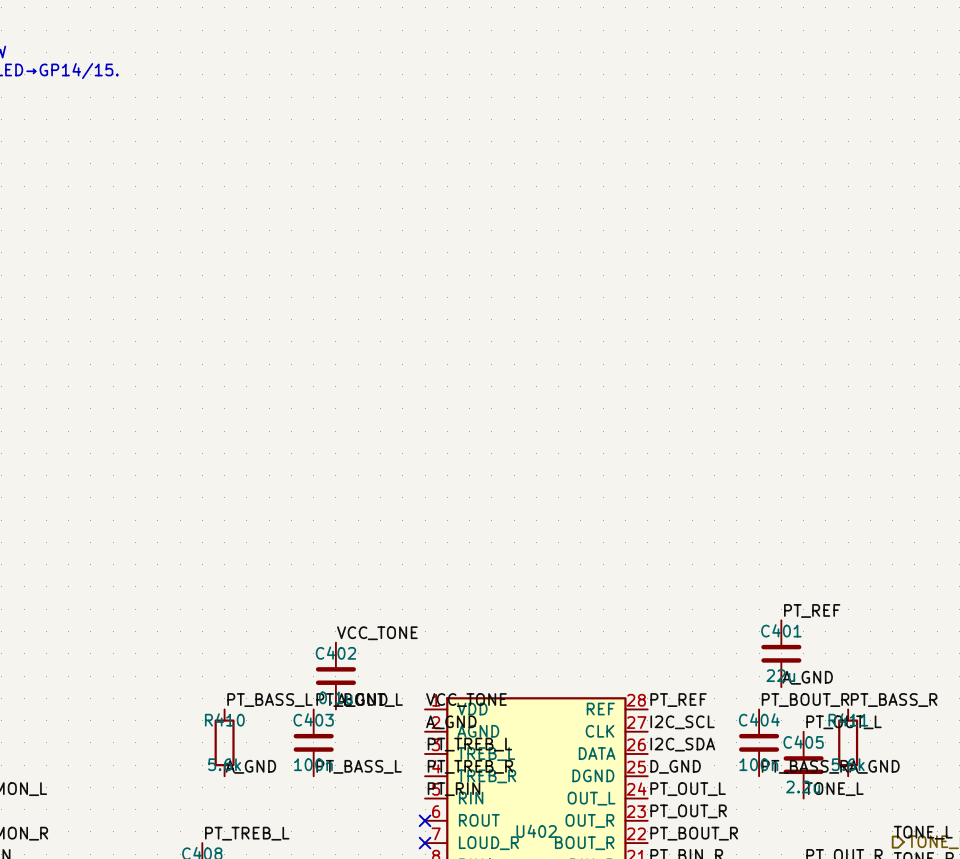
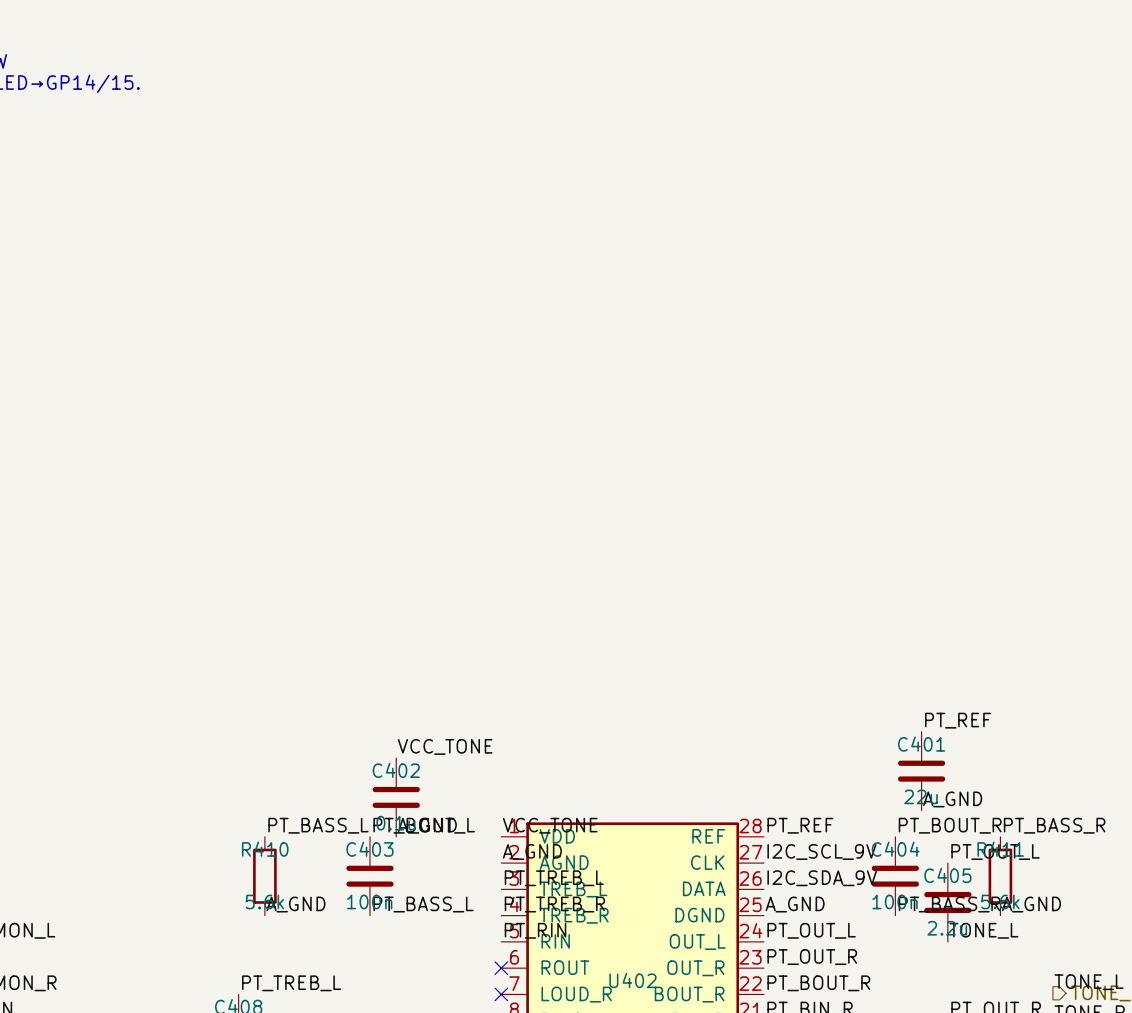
label: I2C_SCL (682, 722) -> I2C_SCL_9V (821, 851)
label: I2C_SDA (682, 744) -> I2C_SDA_9V (822, 878)
label: D_GND (675, 766) -> A_GND (795, 904)

